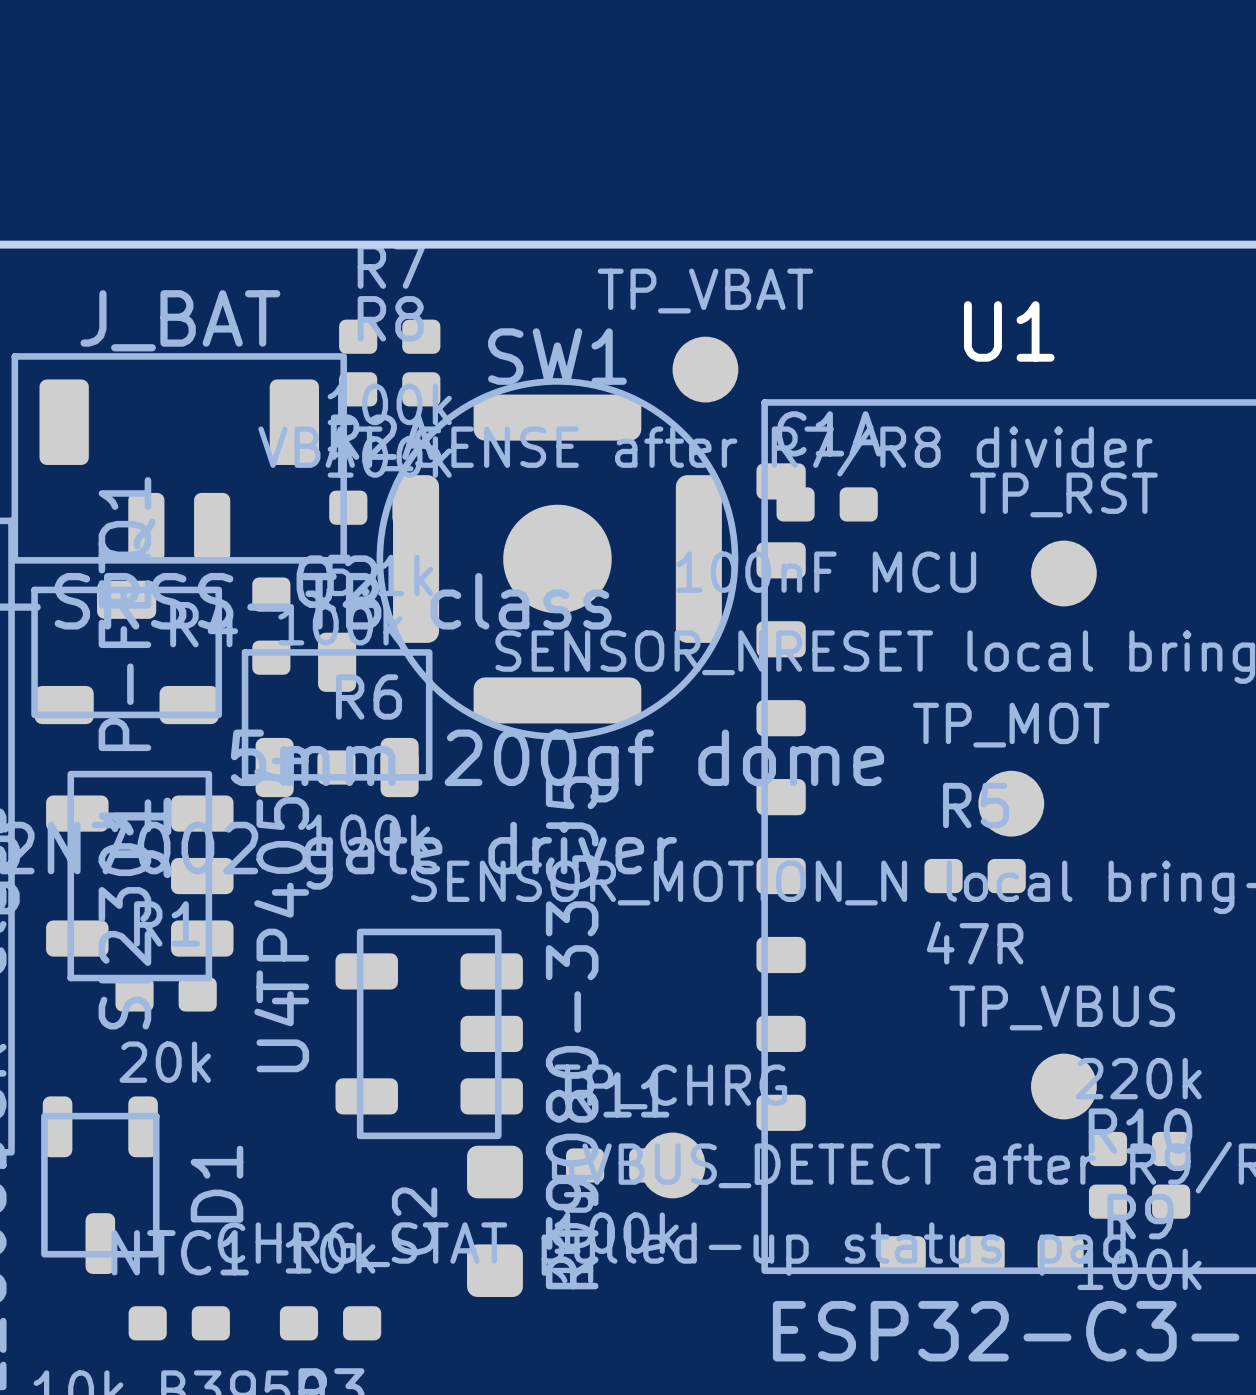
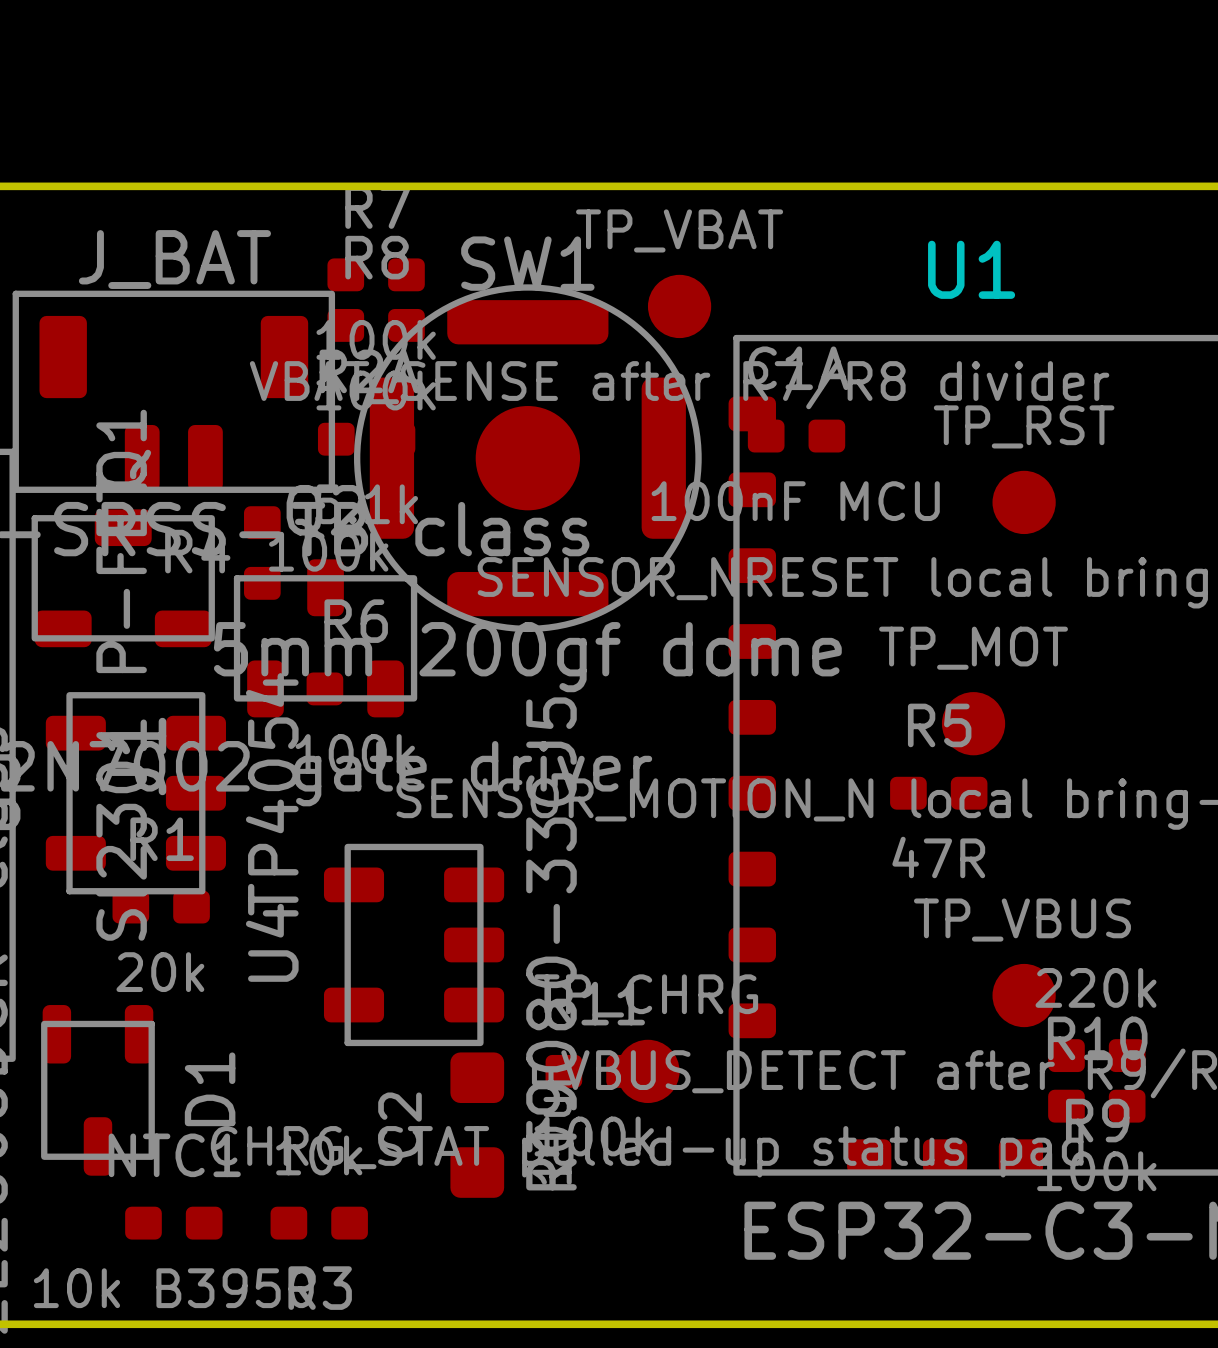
SW1 position: (557, 559) -> (527, 458)

